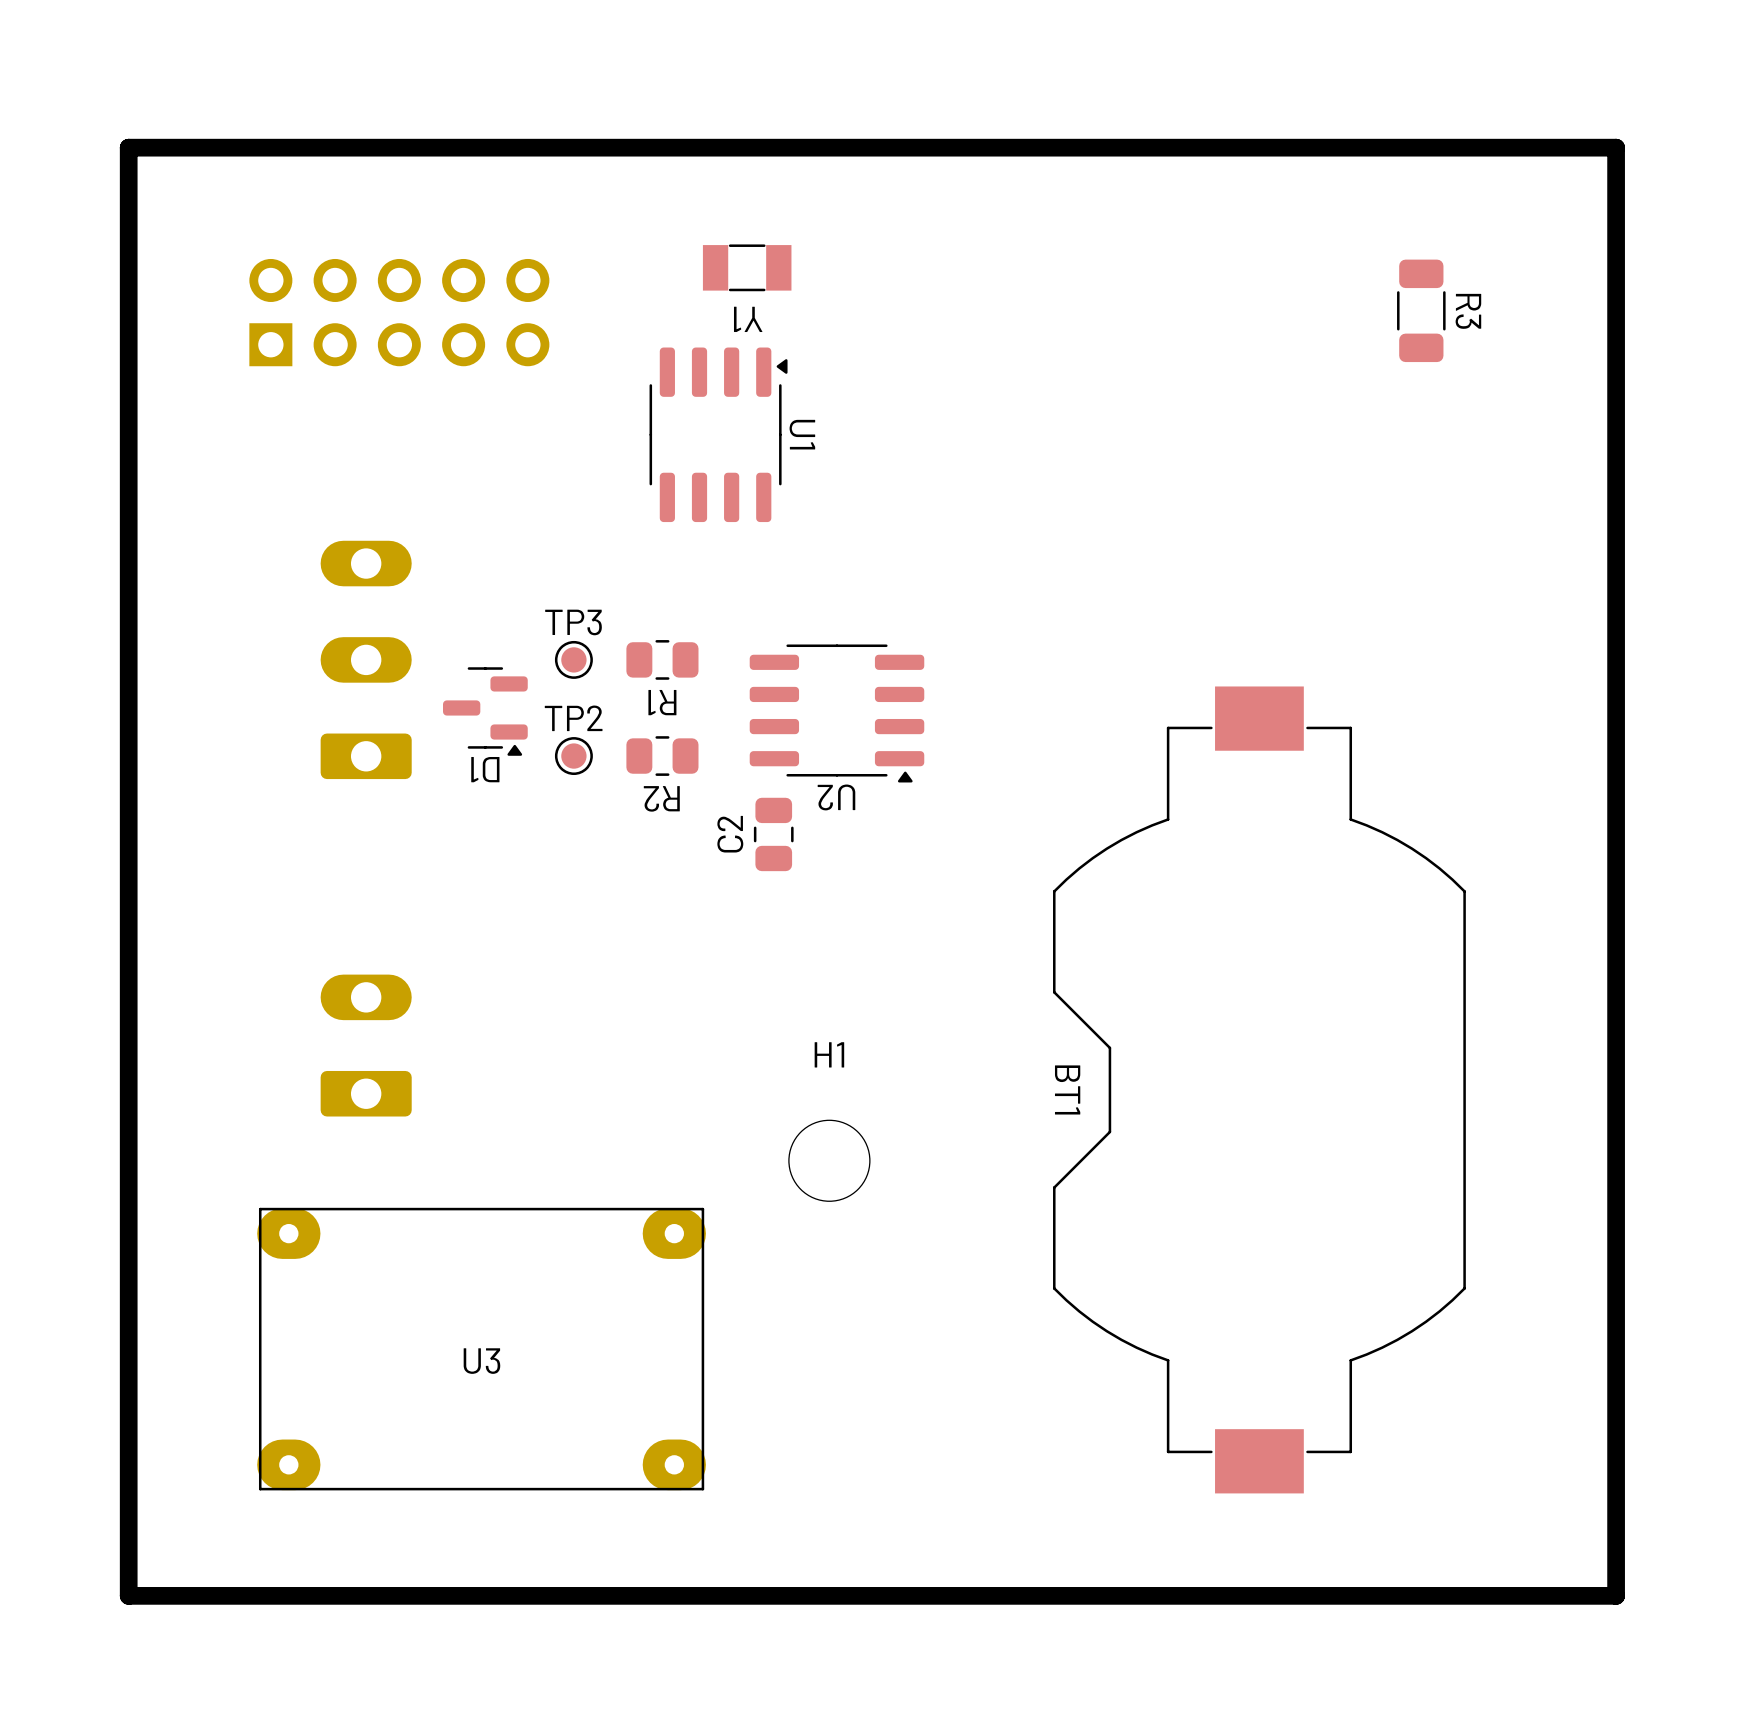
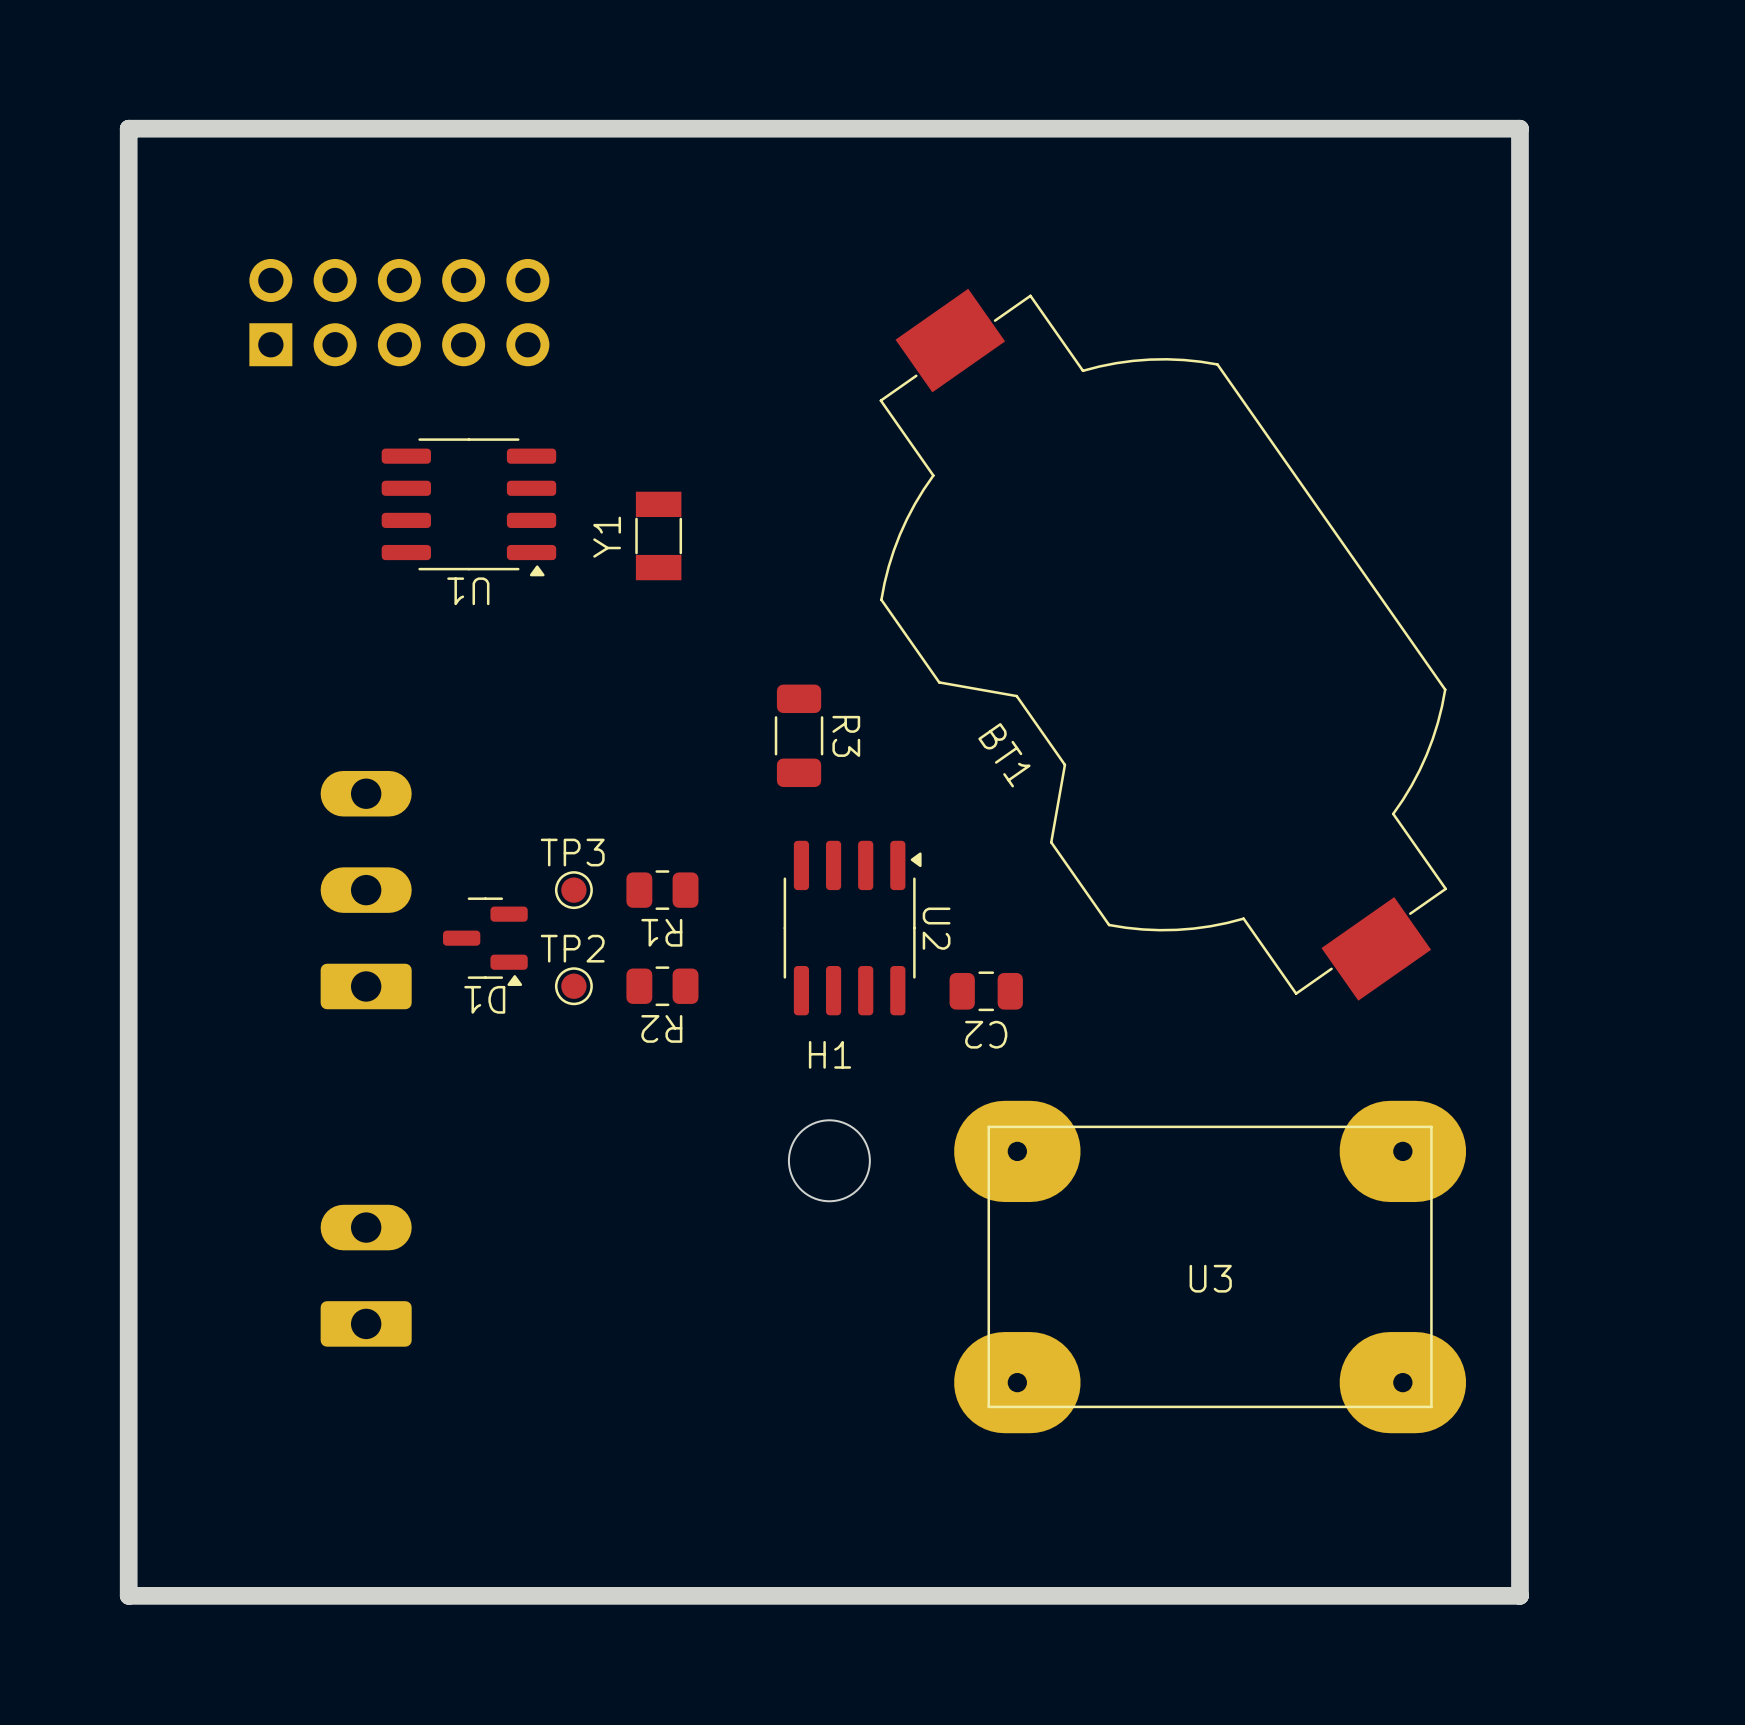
board edge: (128, 147) (1616, 147) (1616, 1595) (1519, 1595) -> (128, 147) (128, 128) (1519, 128) (1519, 1595)
Y1 rotation: 0° (747, 267) -> 90° clockwise (658, 535)
Y1 position: (747, 267) -> (658, 535)
R3 position: (1421, 310) -> (799, 735)
U1 rotation: 0° (718, 434) -> 90° clockwise (468, 507)
U1 position: (718, 434) -> (468, 507)
part position: (366, 659) -> (366, 890)
TP3 position: (573, 659) -> (573, 890)
R1 position: (662, 659) -> (662, 890)
D1 position: (485, 711) -> (485, 941)
U2 rotation: 0° (836, 713) -> 90° counterclockwise (852, 928)
U2 position: (836, 713) -> (852, 928)
TP2 position: (573, 756) -> (573, 986)
R2 position: (662, 756) -> (662, 986)
C2 name position: C2 (730, 834) -> C2 (986, 1034)
C2 rotation: 0° (773, 834) -> 90° clockwise (986, 991)
C2 position: (773, 834) -> (986, 991)
part position: (366, 1045) -> (366, 1275)
BT1 rotation: 0° (1259, 1089) -> 35° counterclockwise (1163, 644)
U3 footprint: [257, 1207, 706, 1491] -> [954, 1100, 1467, 1434]

